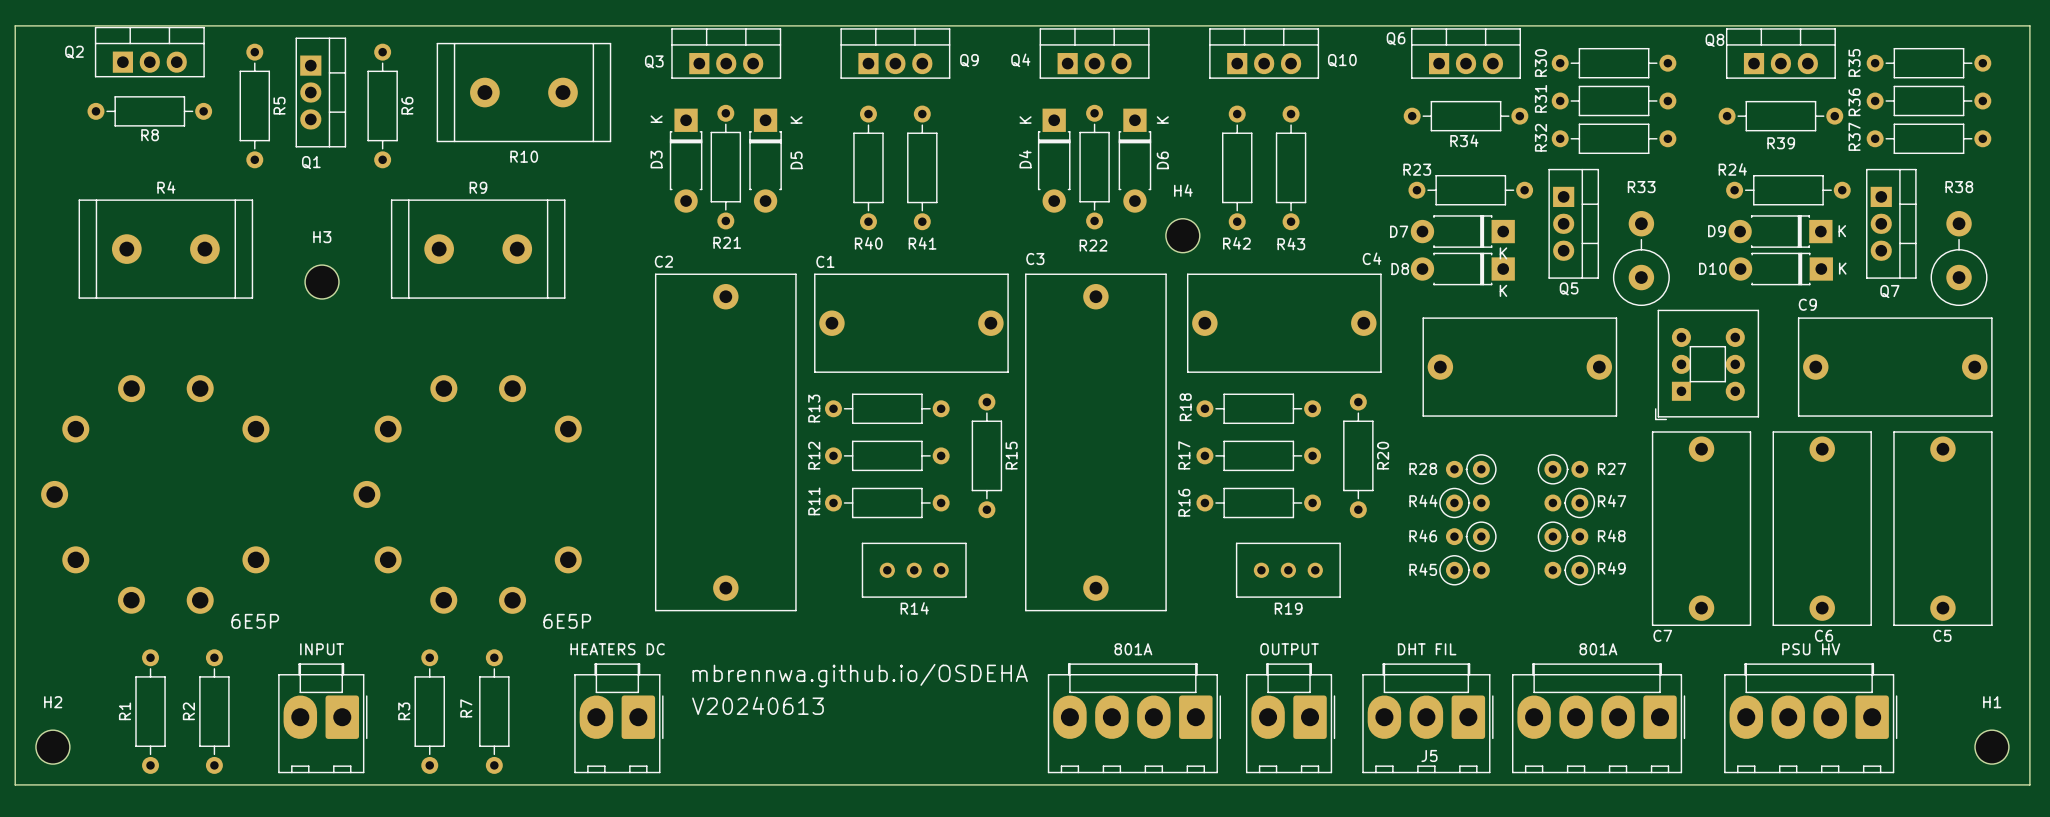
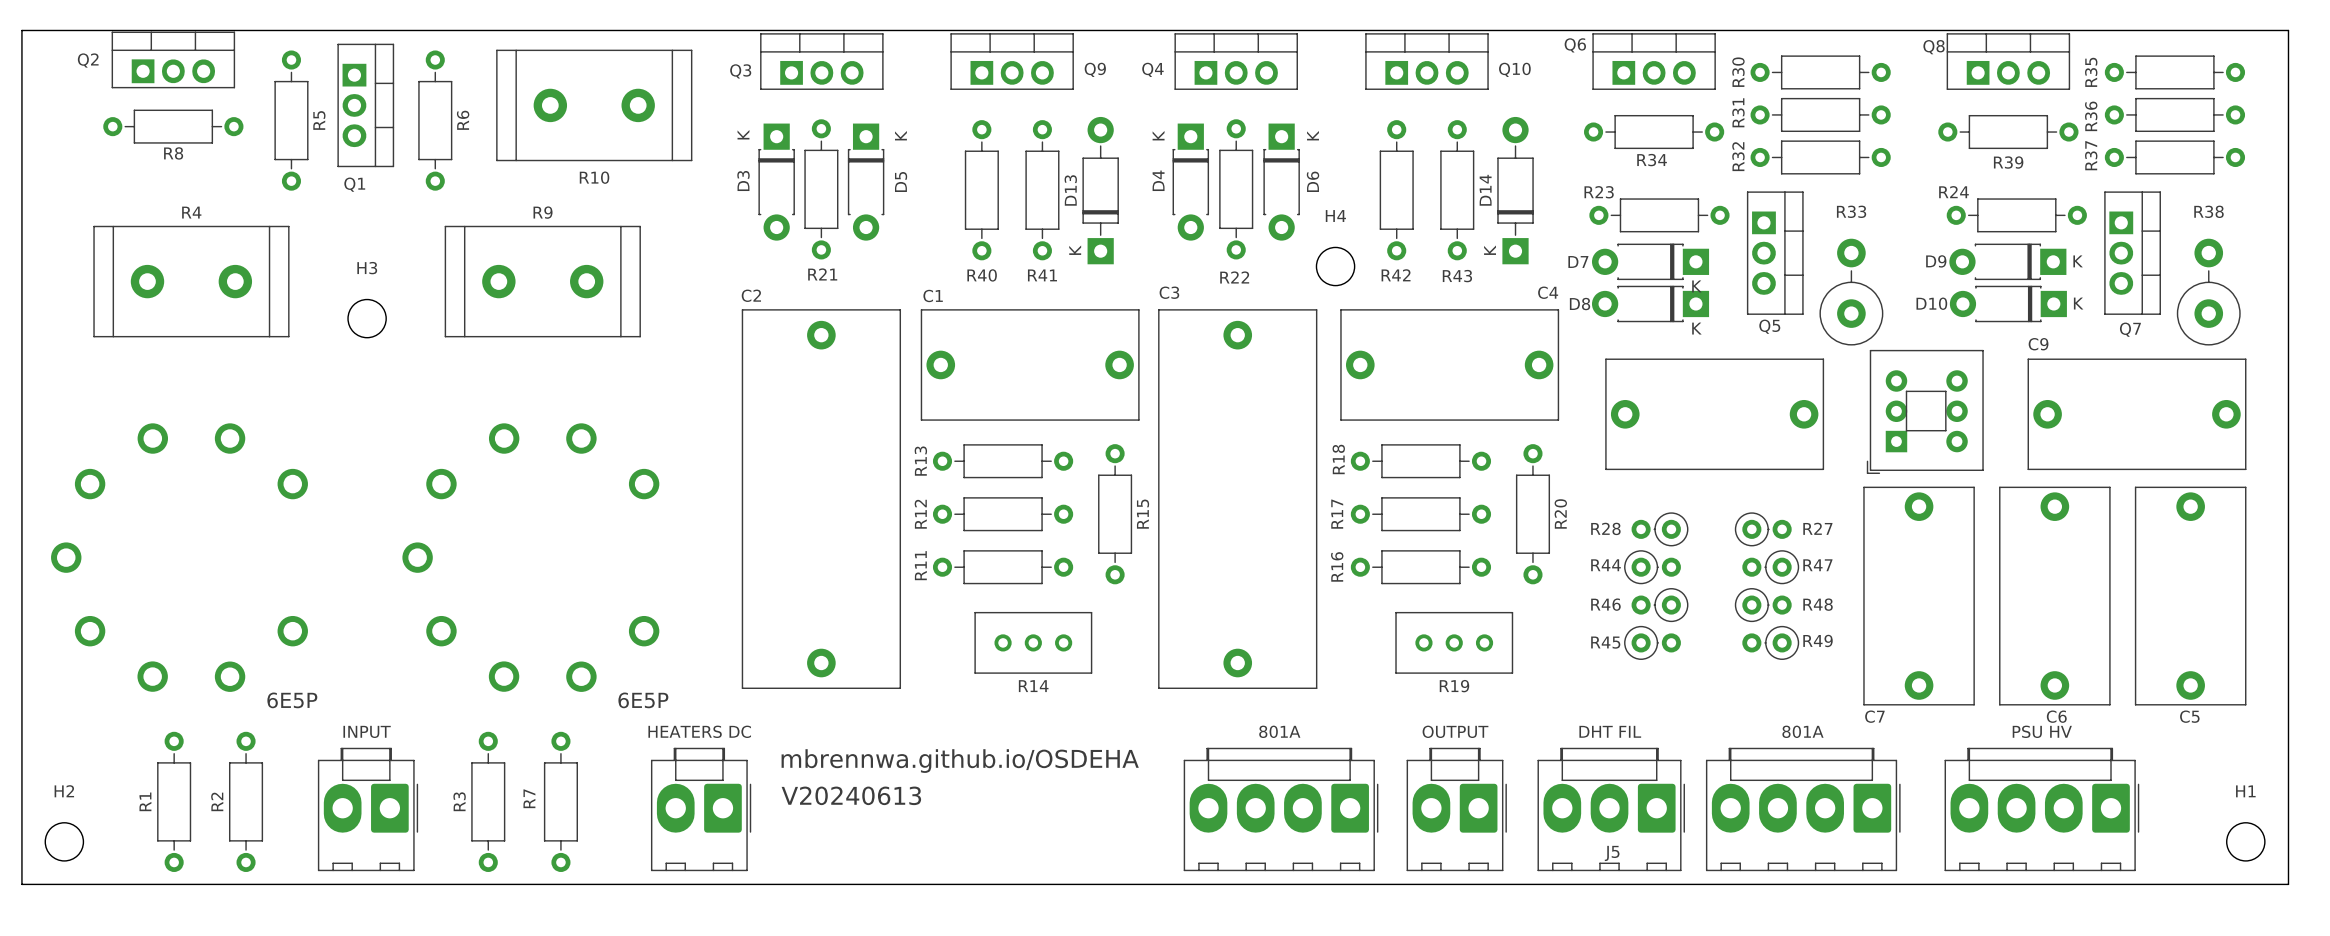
D13: none -> (1100, 190)
D14: none -> (1515, 190)

